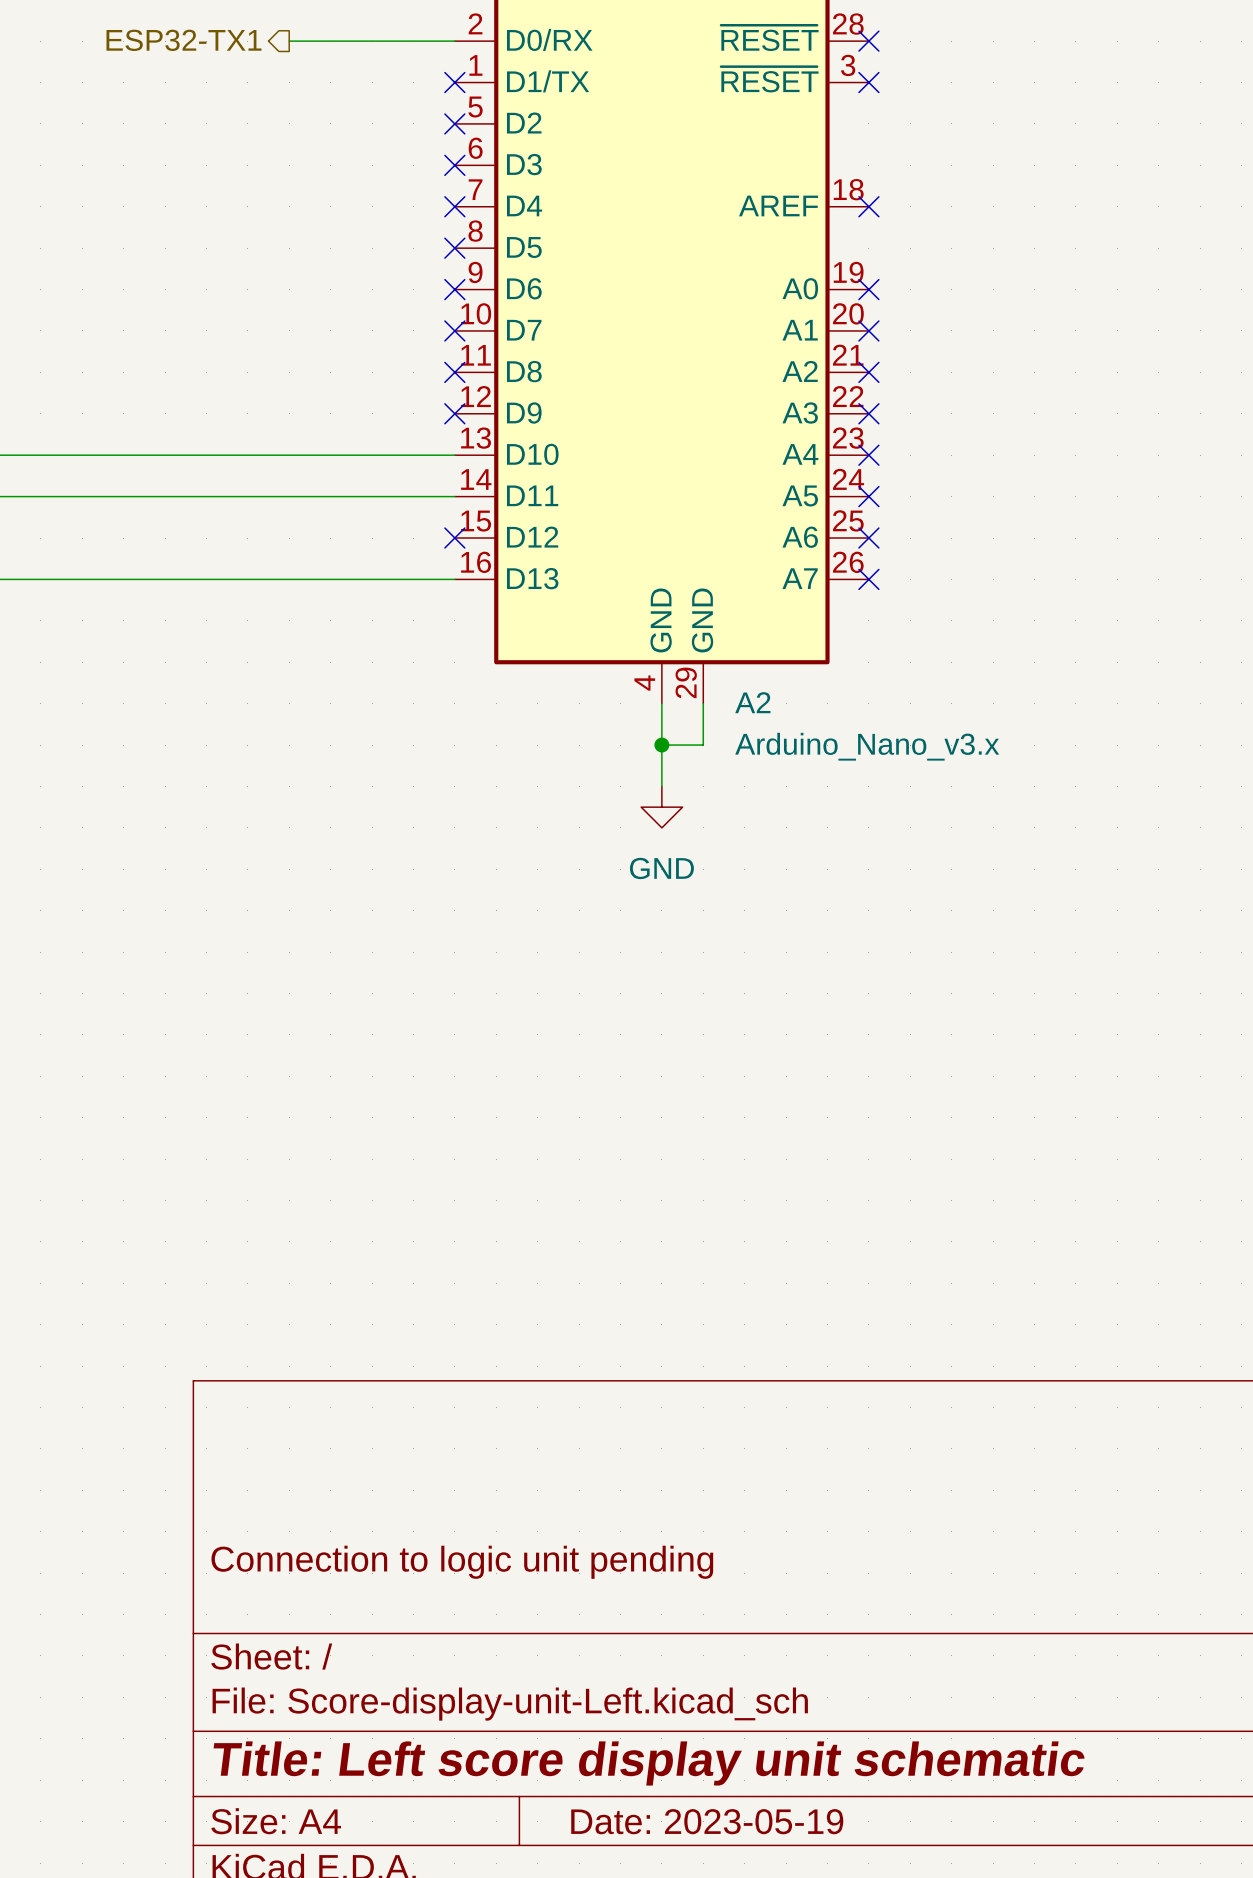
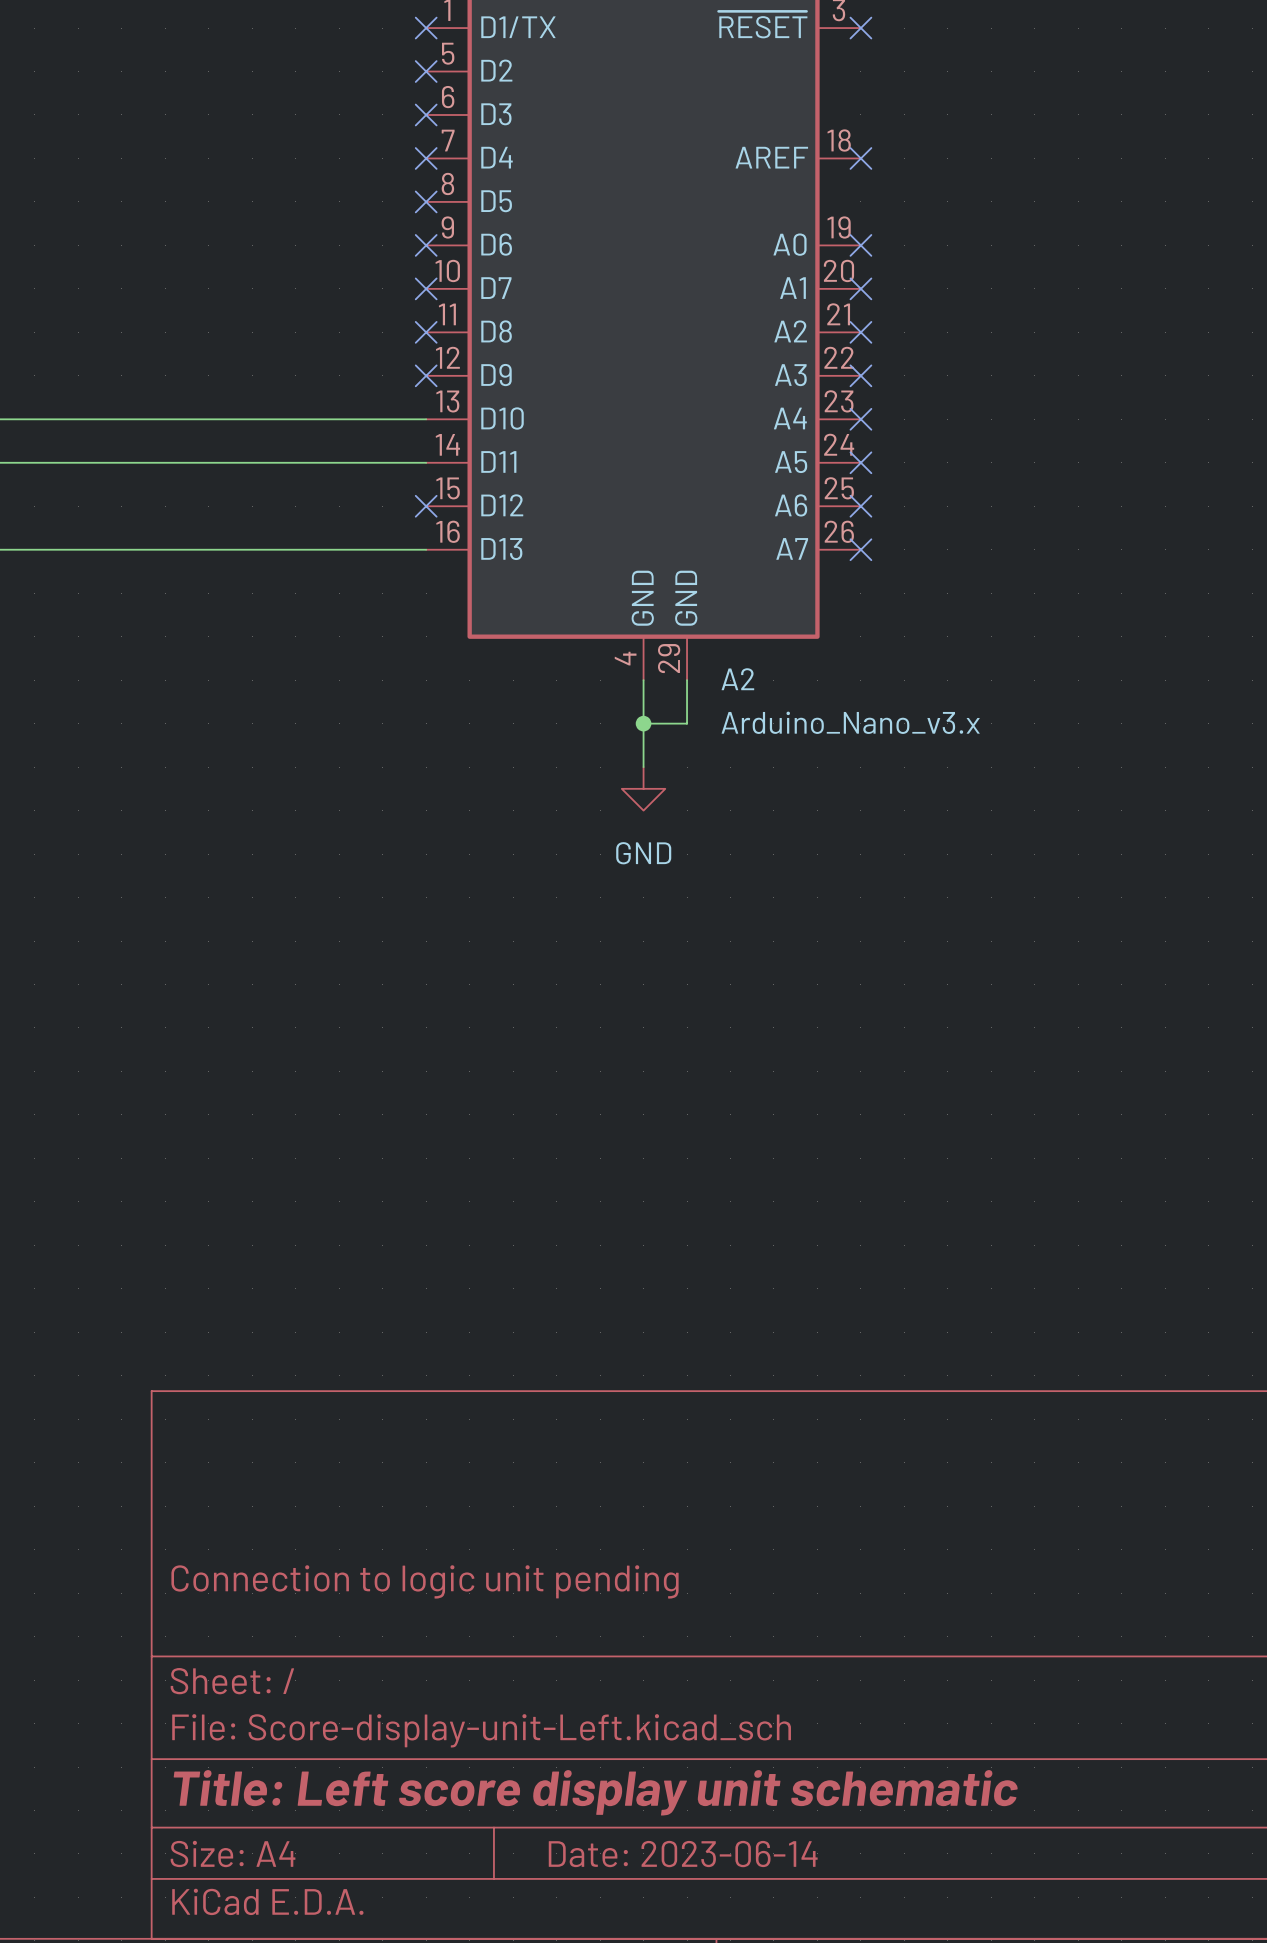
title block: Date: 2023-05-19 (707, 1821) -> Date: 2023-06-14 (683, 1854)

